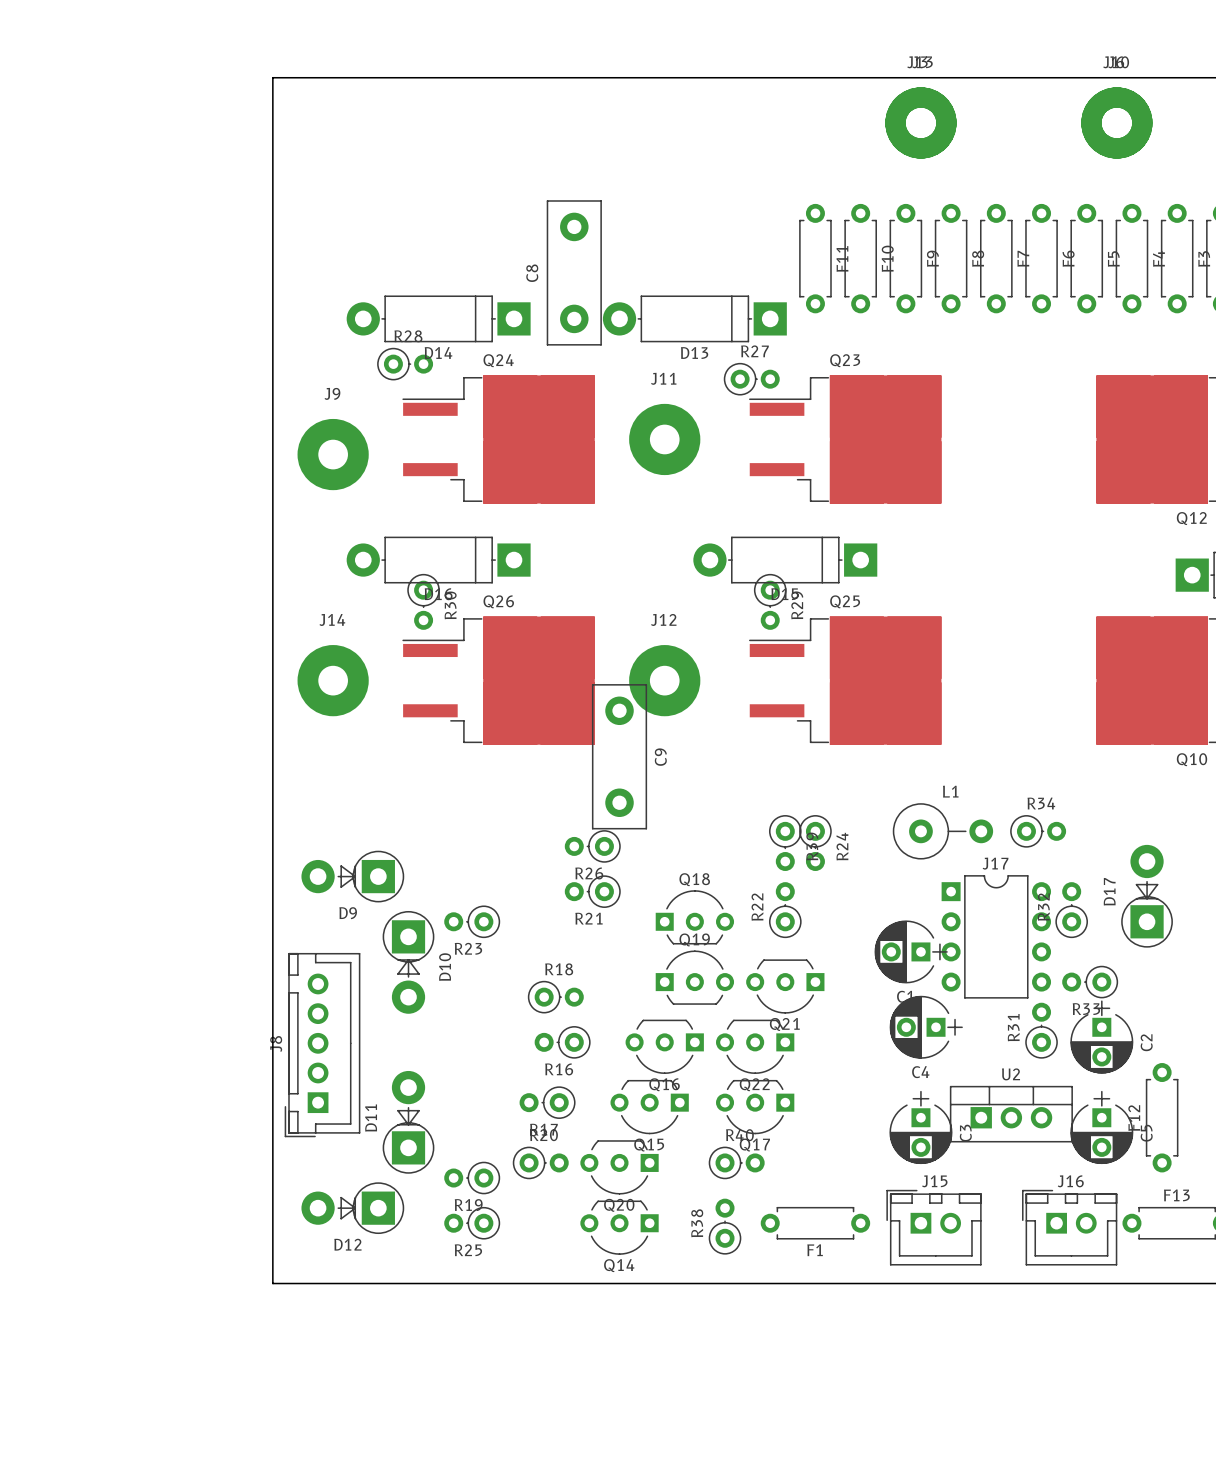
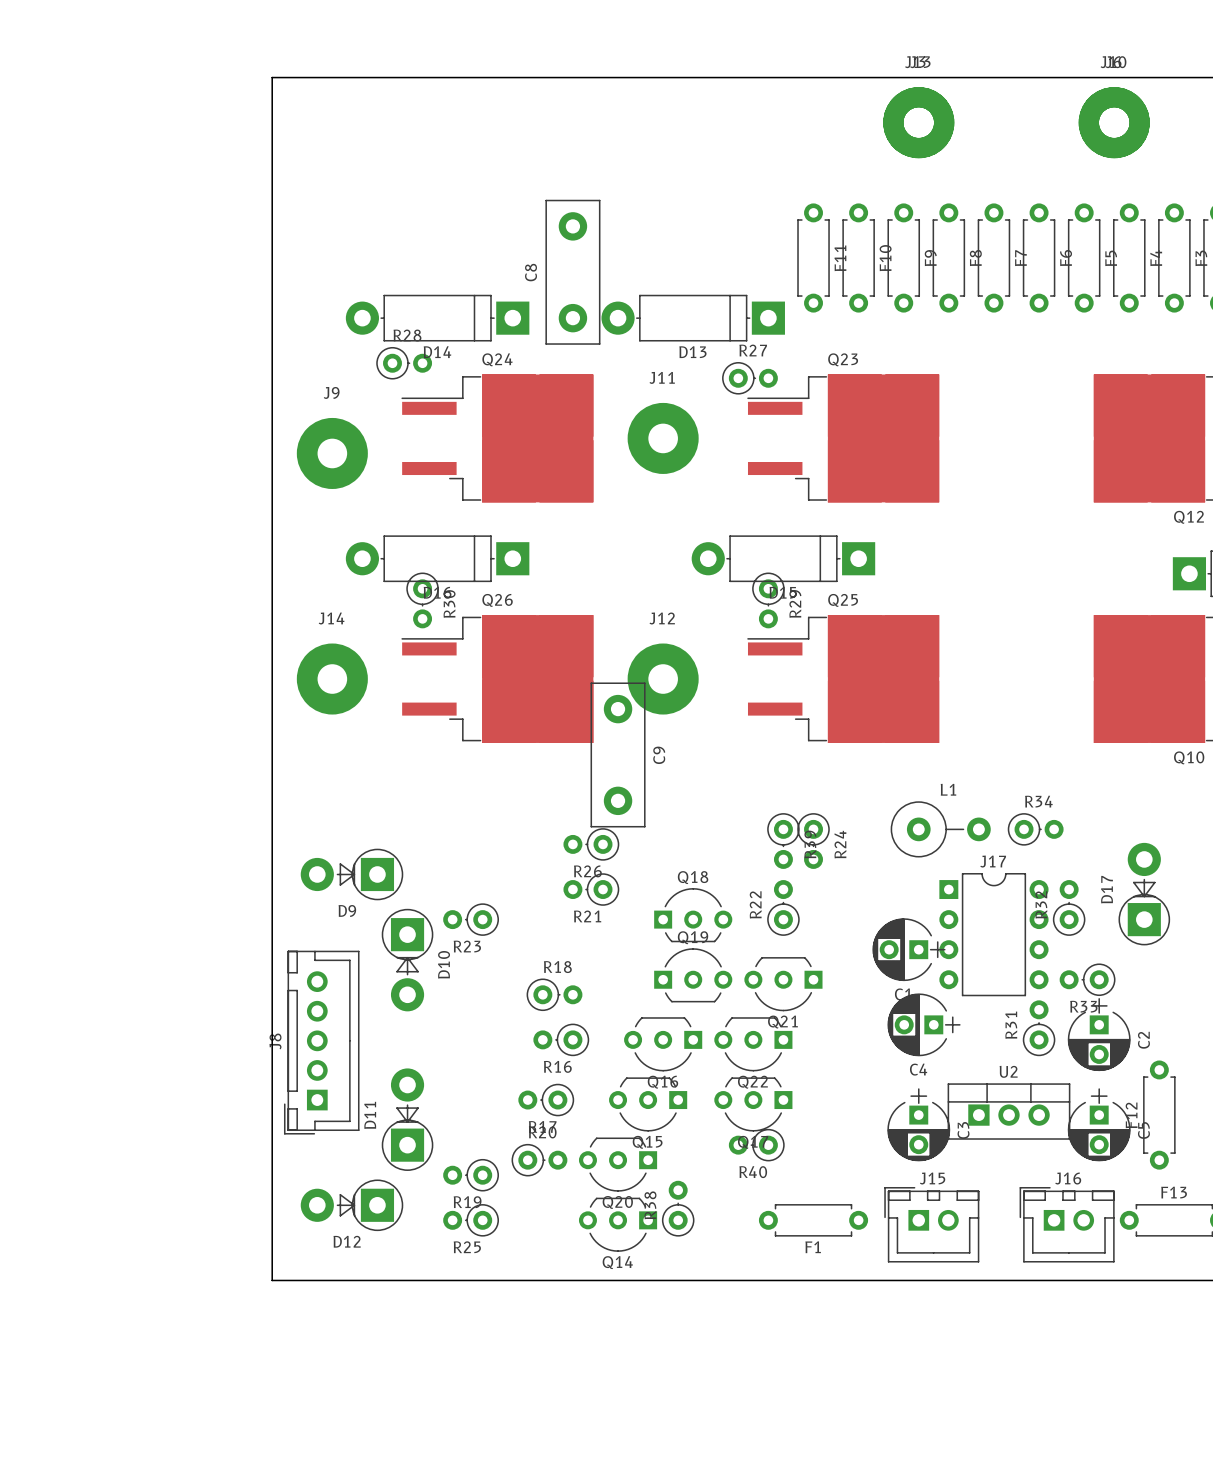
R40 rotation: 0° (736, 1162) -> 180° (756, 1145)
R38 position: (725, 1226) -> (678, 1208)

